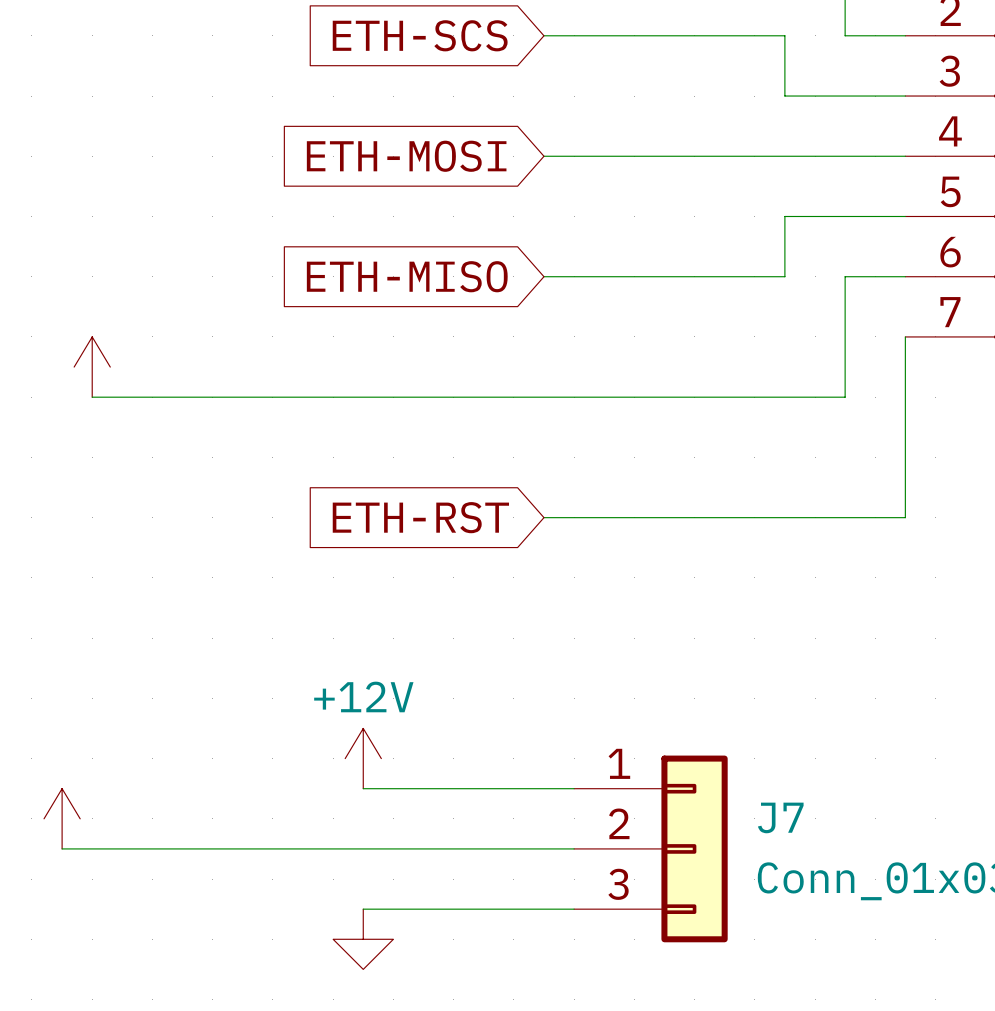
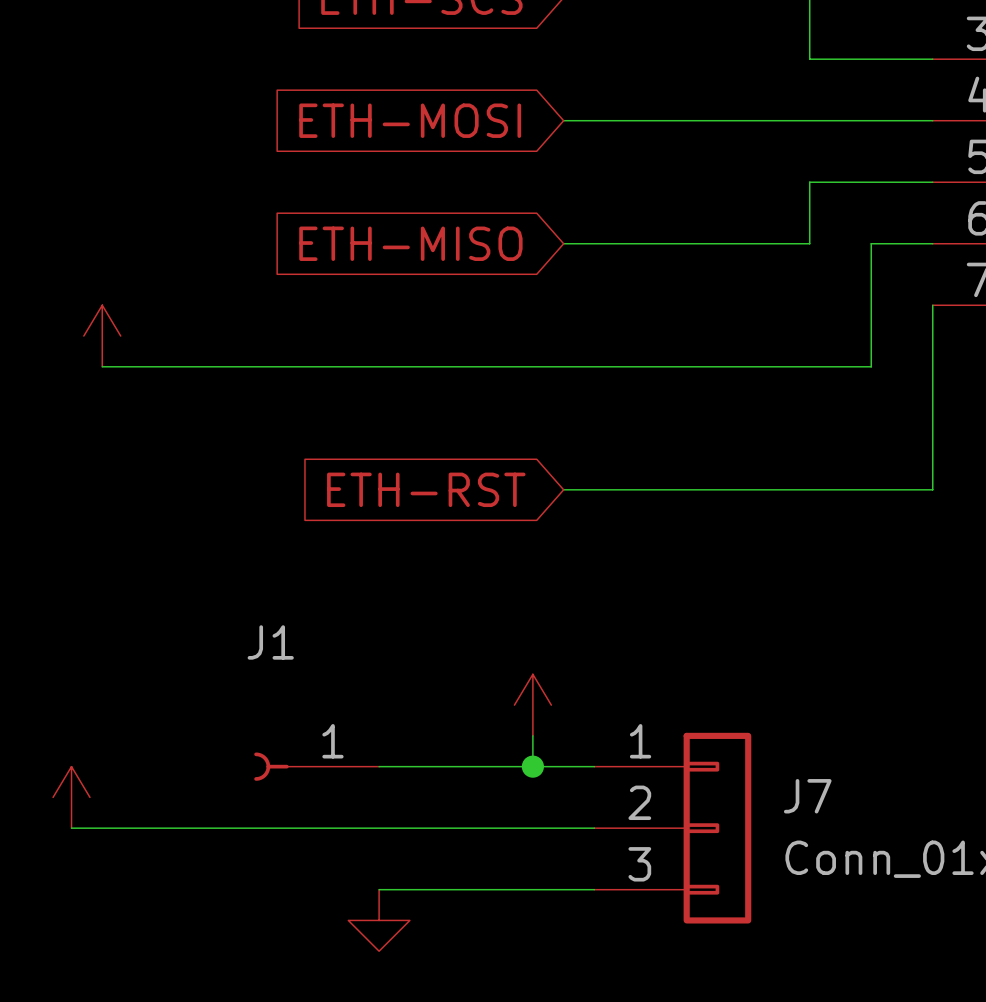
power symbol: none -> (532, 705)
power symbol: +12V (363, 758) -> none
wire: none -> (532, 735) (532, 766)
J1: none -> (316, 766)
junction: none -> (532, 766)

